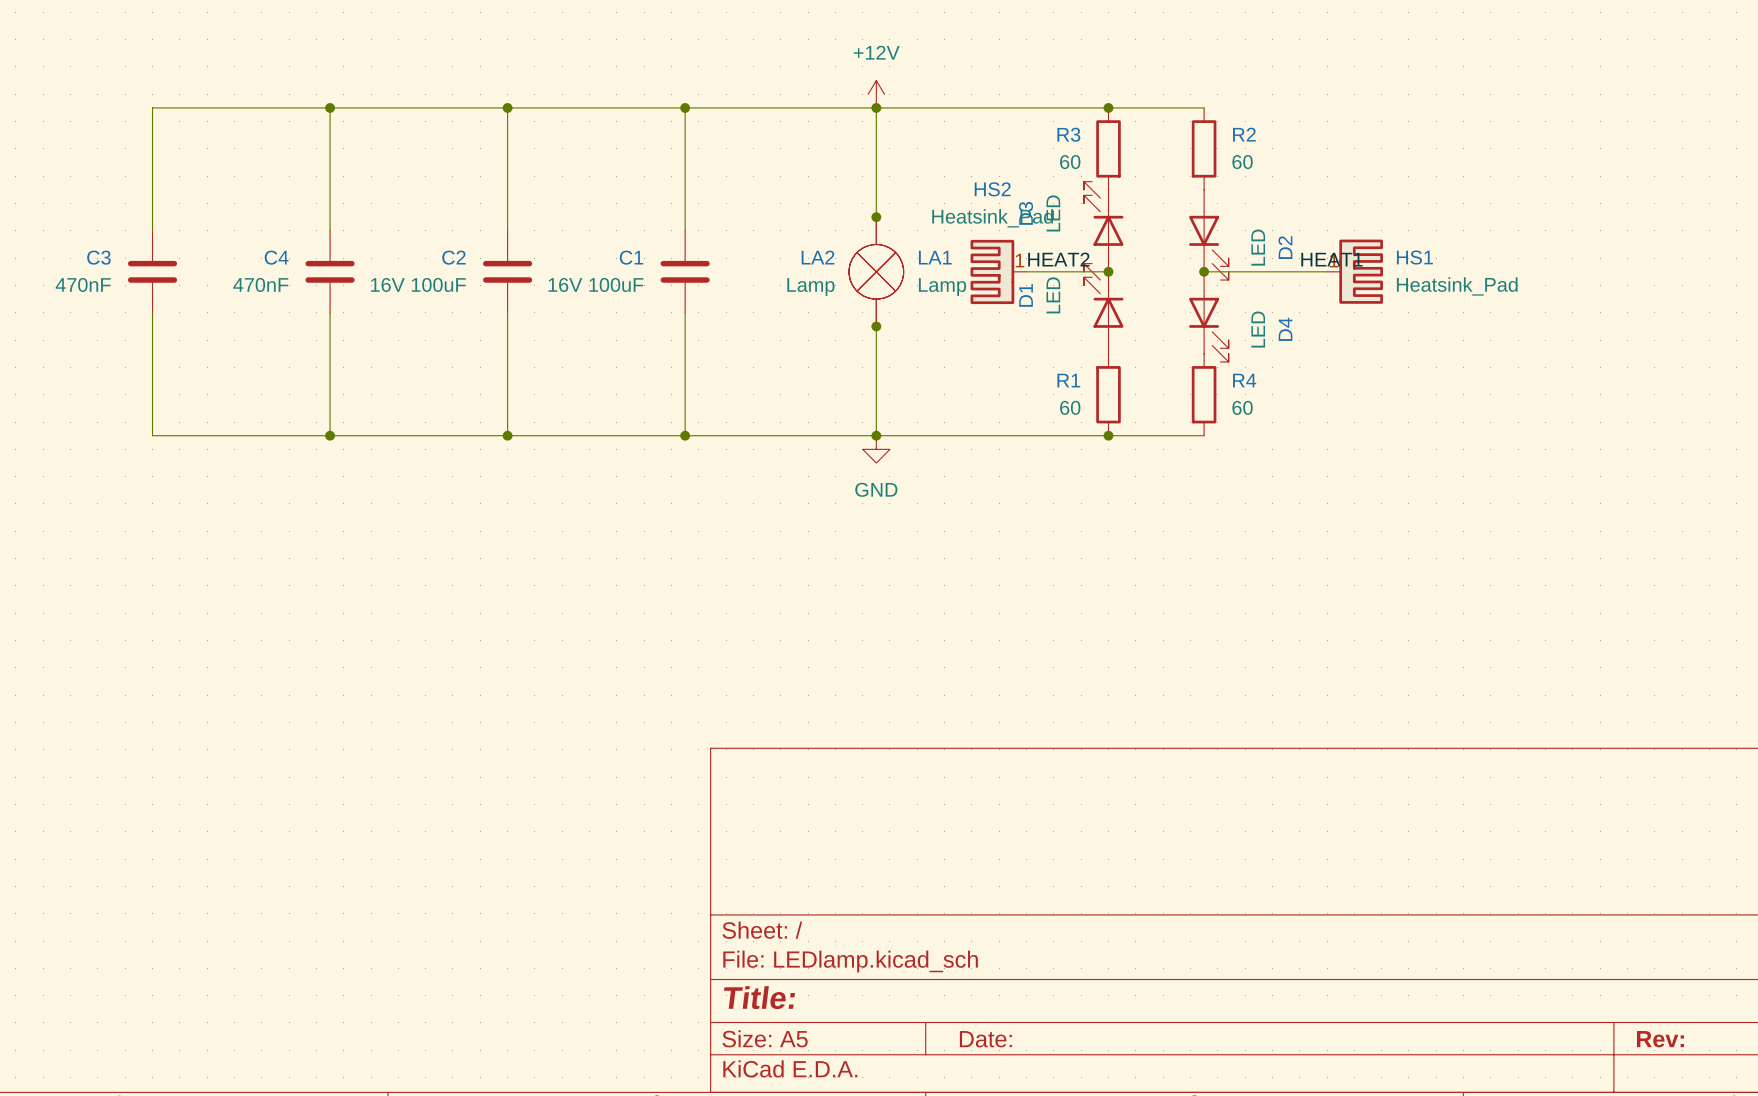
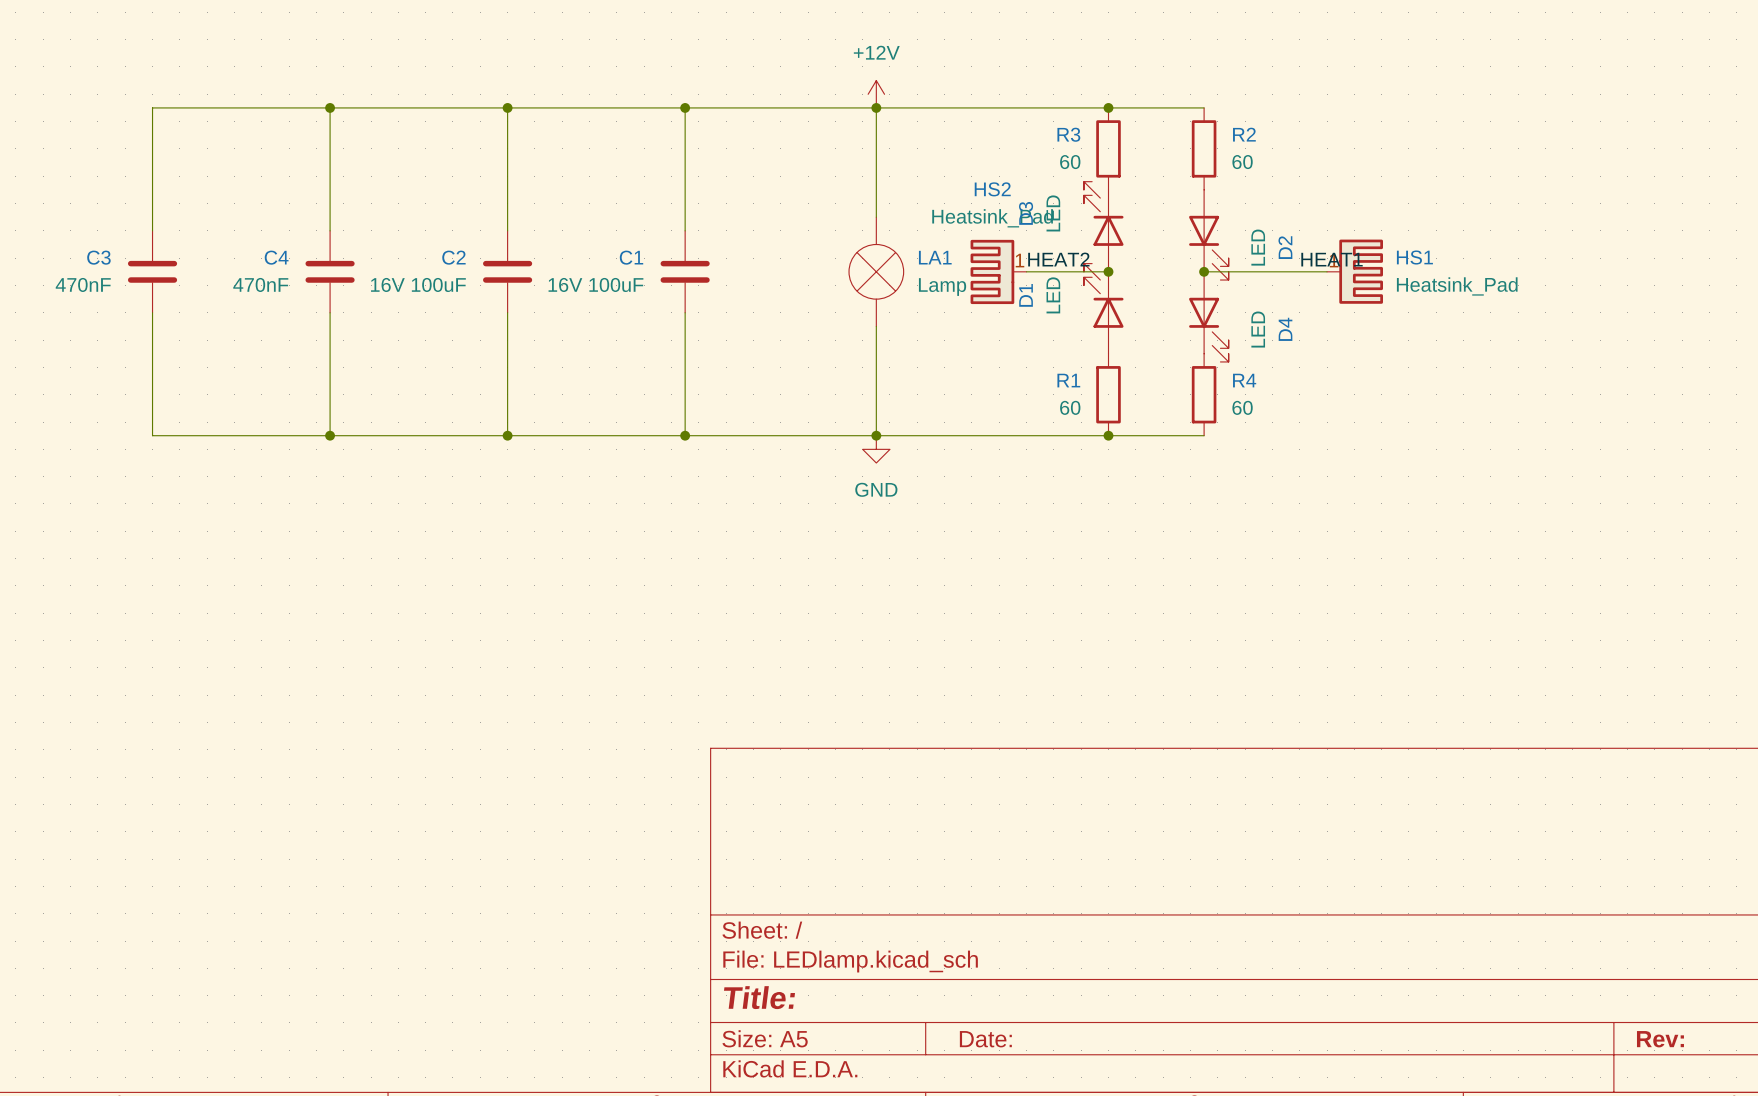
junction: (876, 217) -> none
LA2: Lamp (876, 271) -> none
junction: (876, 326) -> none

